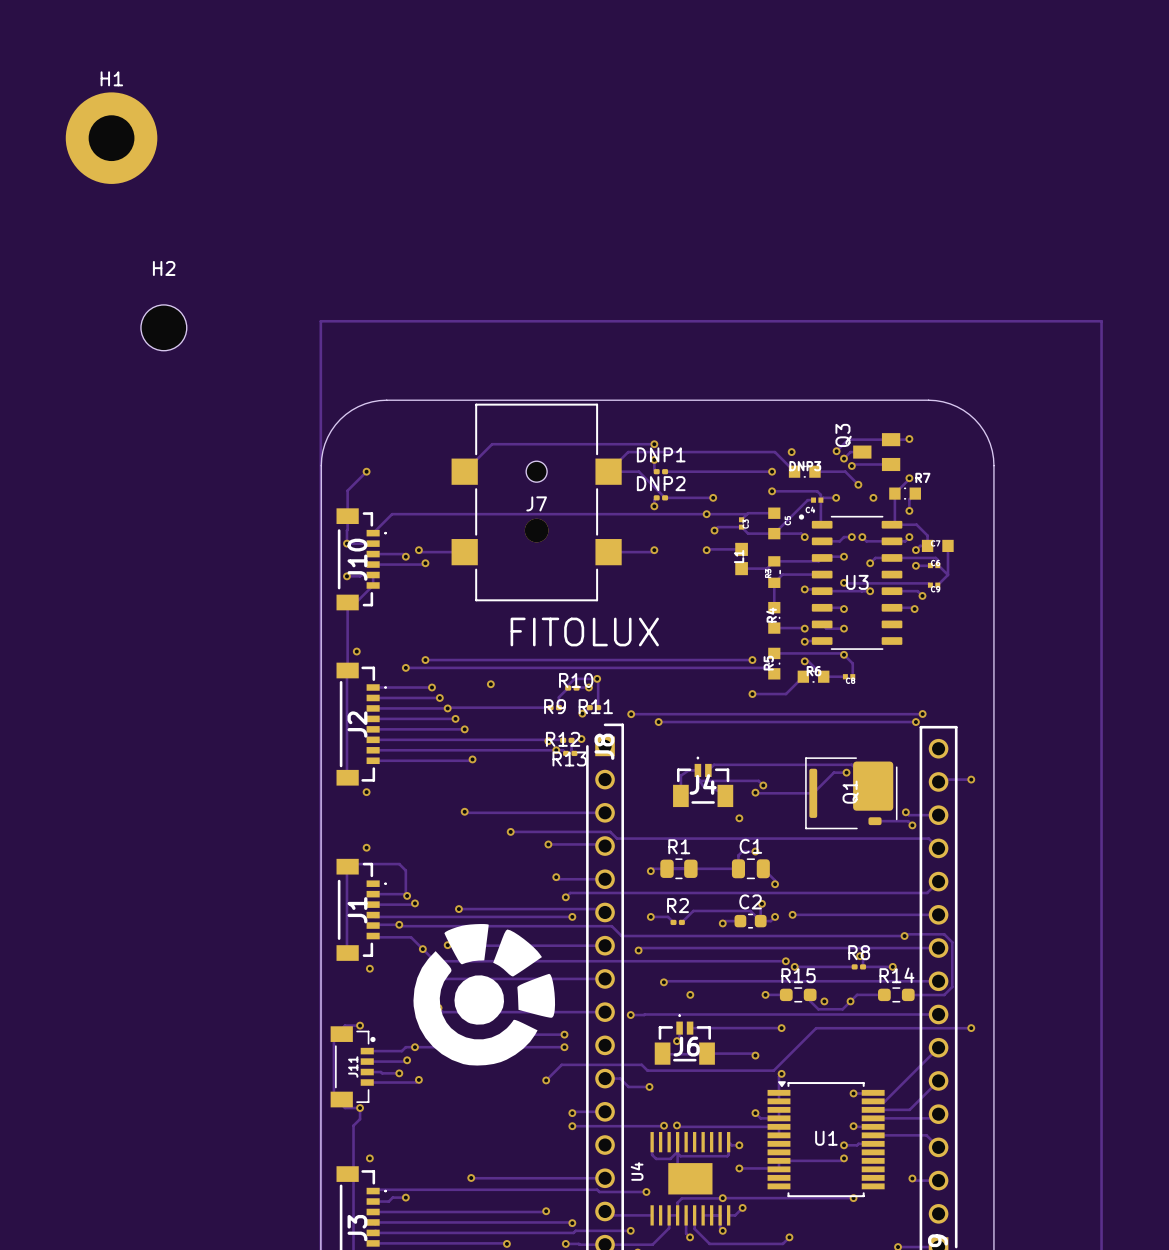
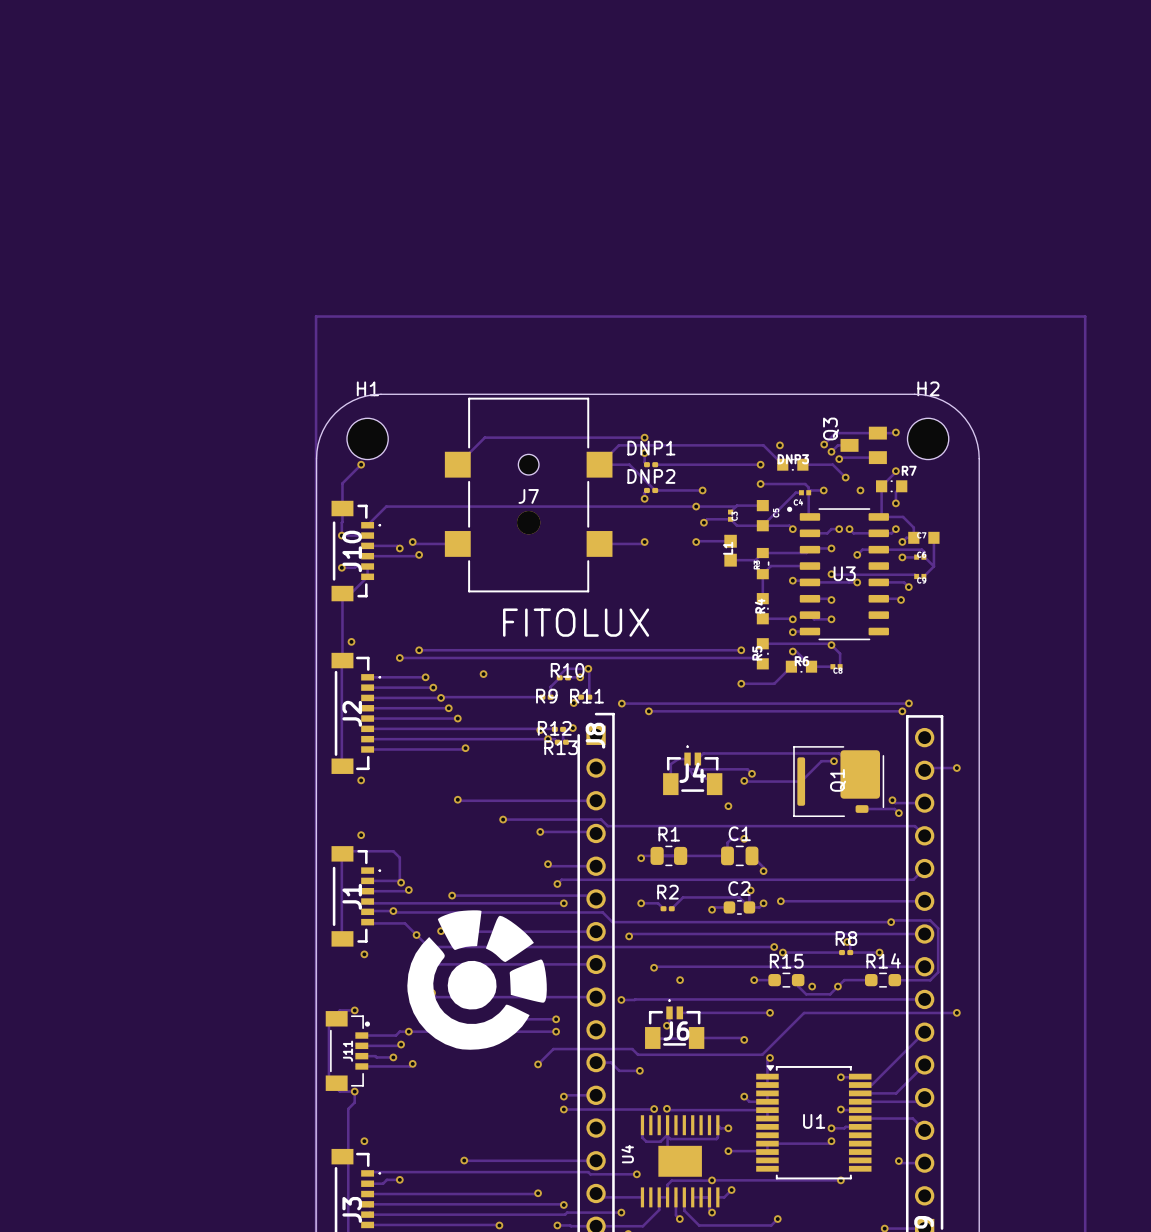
H1 footprint: [65, 92, 158, 184] -> [346, 418, 389, 460]
H2 footprint: [140, 304, 187, 351] -> [907, 418, 949, 460]

